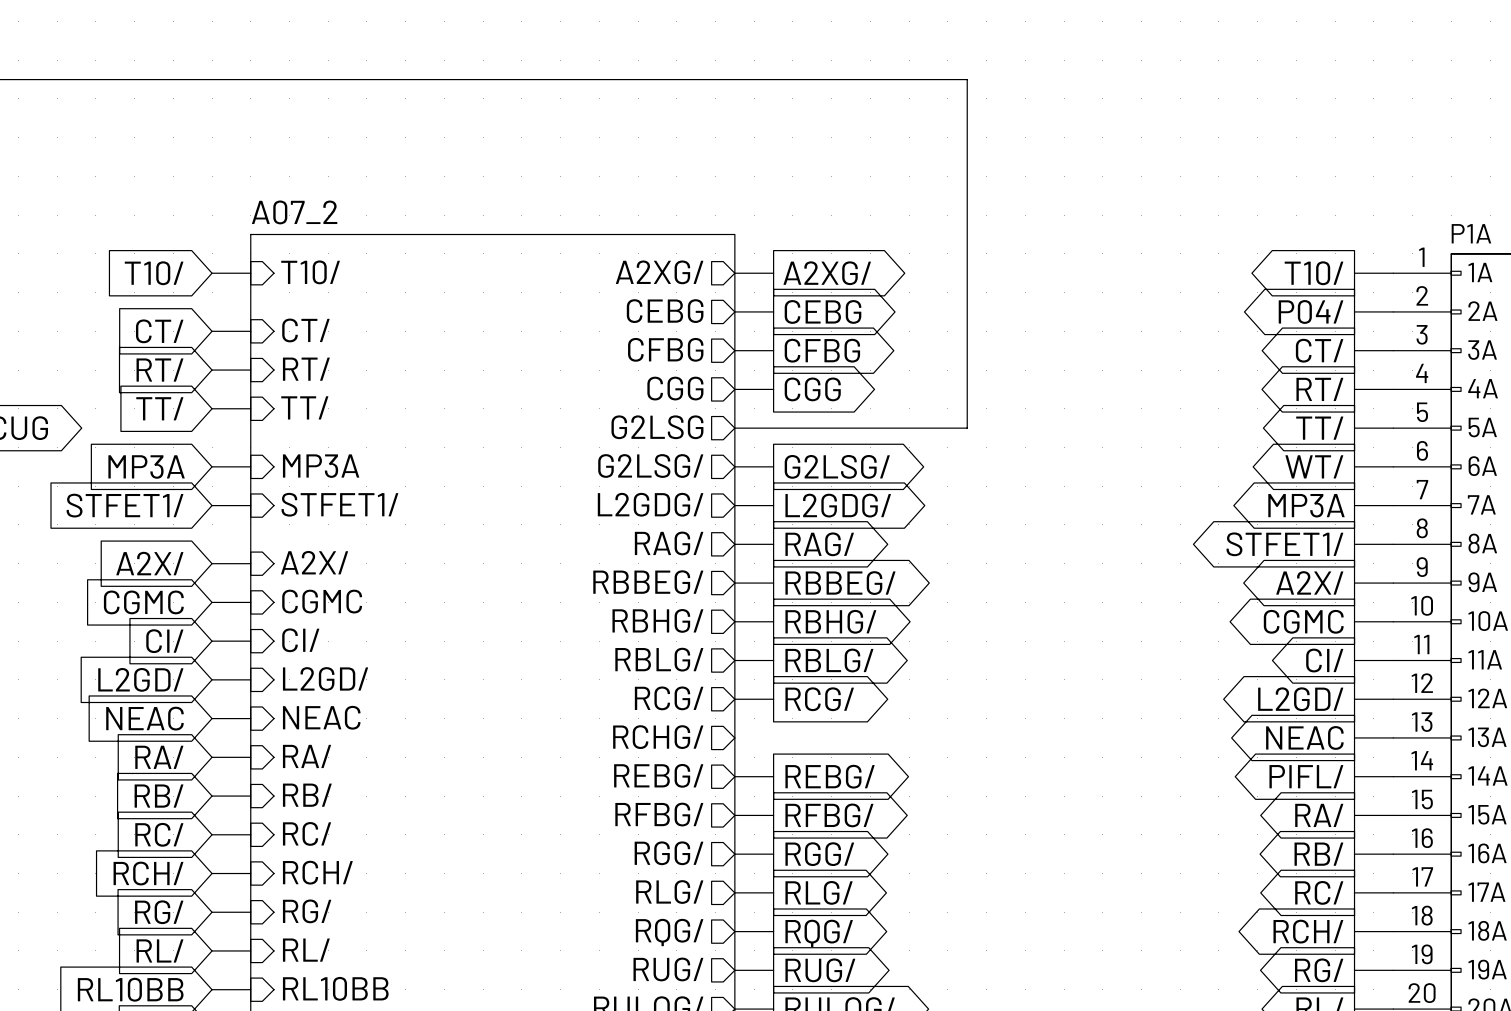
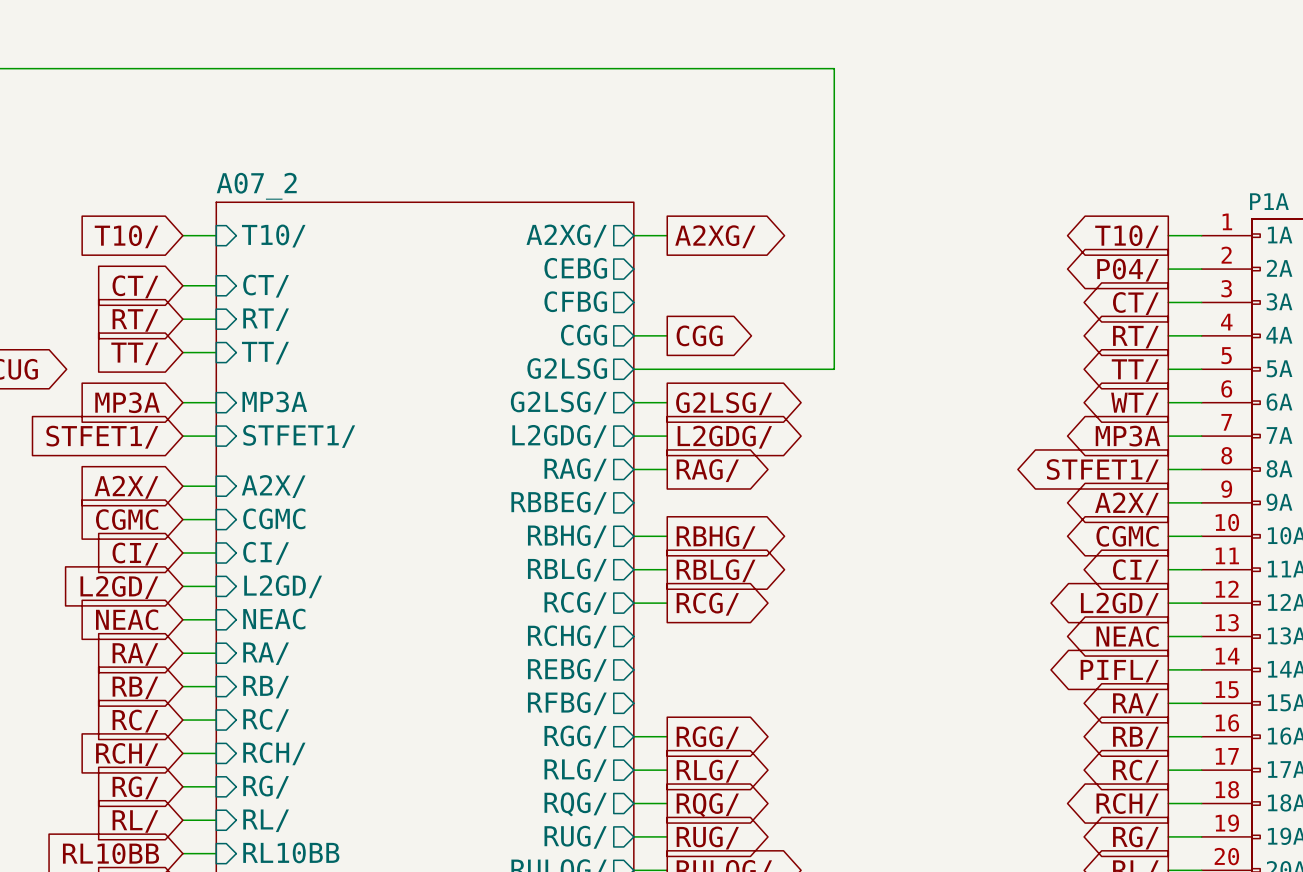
wire: (734, 311) (773, 311) -> none
global label: CEBG (823, 311) -> none
wire: (734, 350) (773, 350) -> none
global label: CFBG (822, 350) -> none
wire: (734, 583) (773, 583) -> none
global label: RBBEG/ (840, 583) -> none
wire: (734, 776) (773, 776) -> none
global label: REBG/ (830, 776) -> none
wire: (734, 815) (773, 815) -> none
global label: RFBG/ (829, 815) -> none

